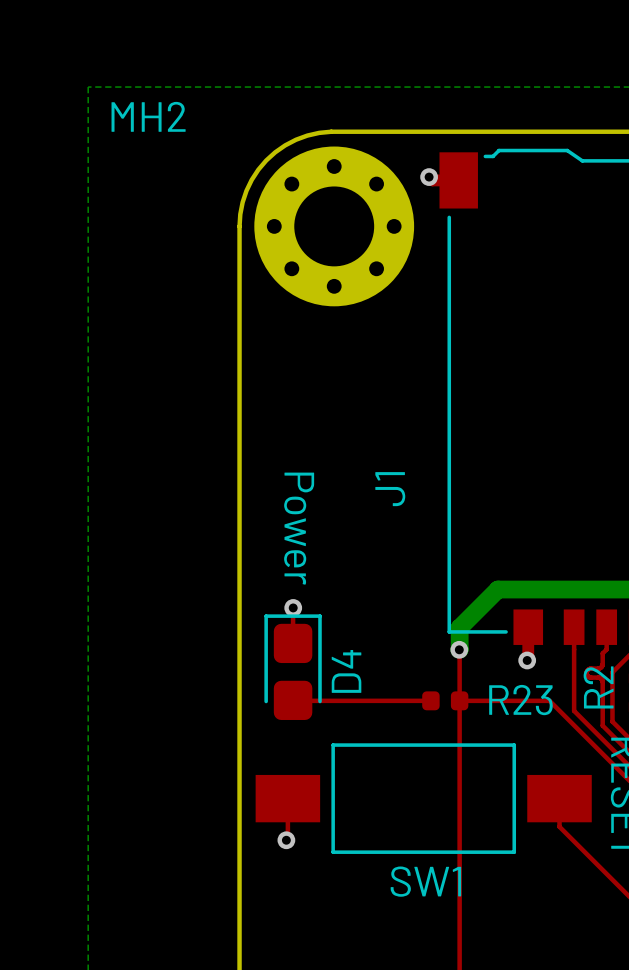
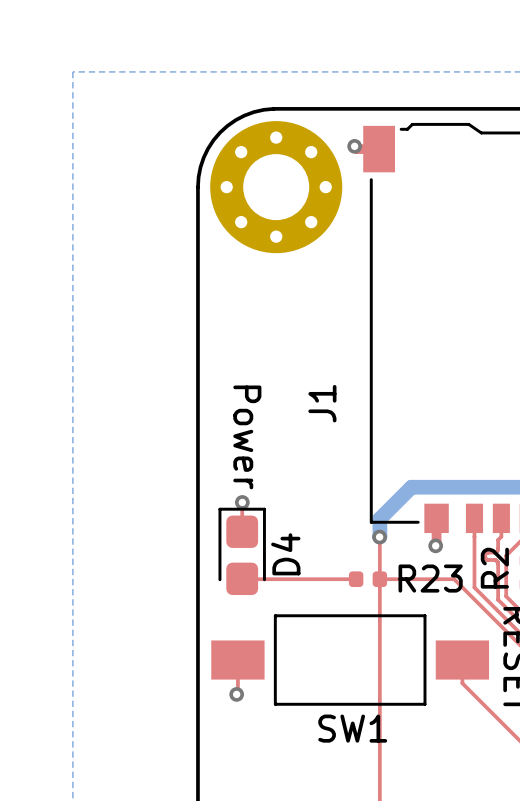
MH2 name: MH2 (148, 116) -> none

